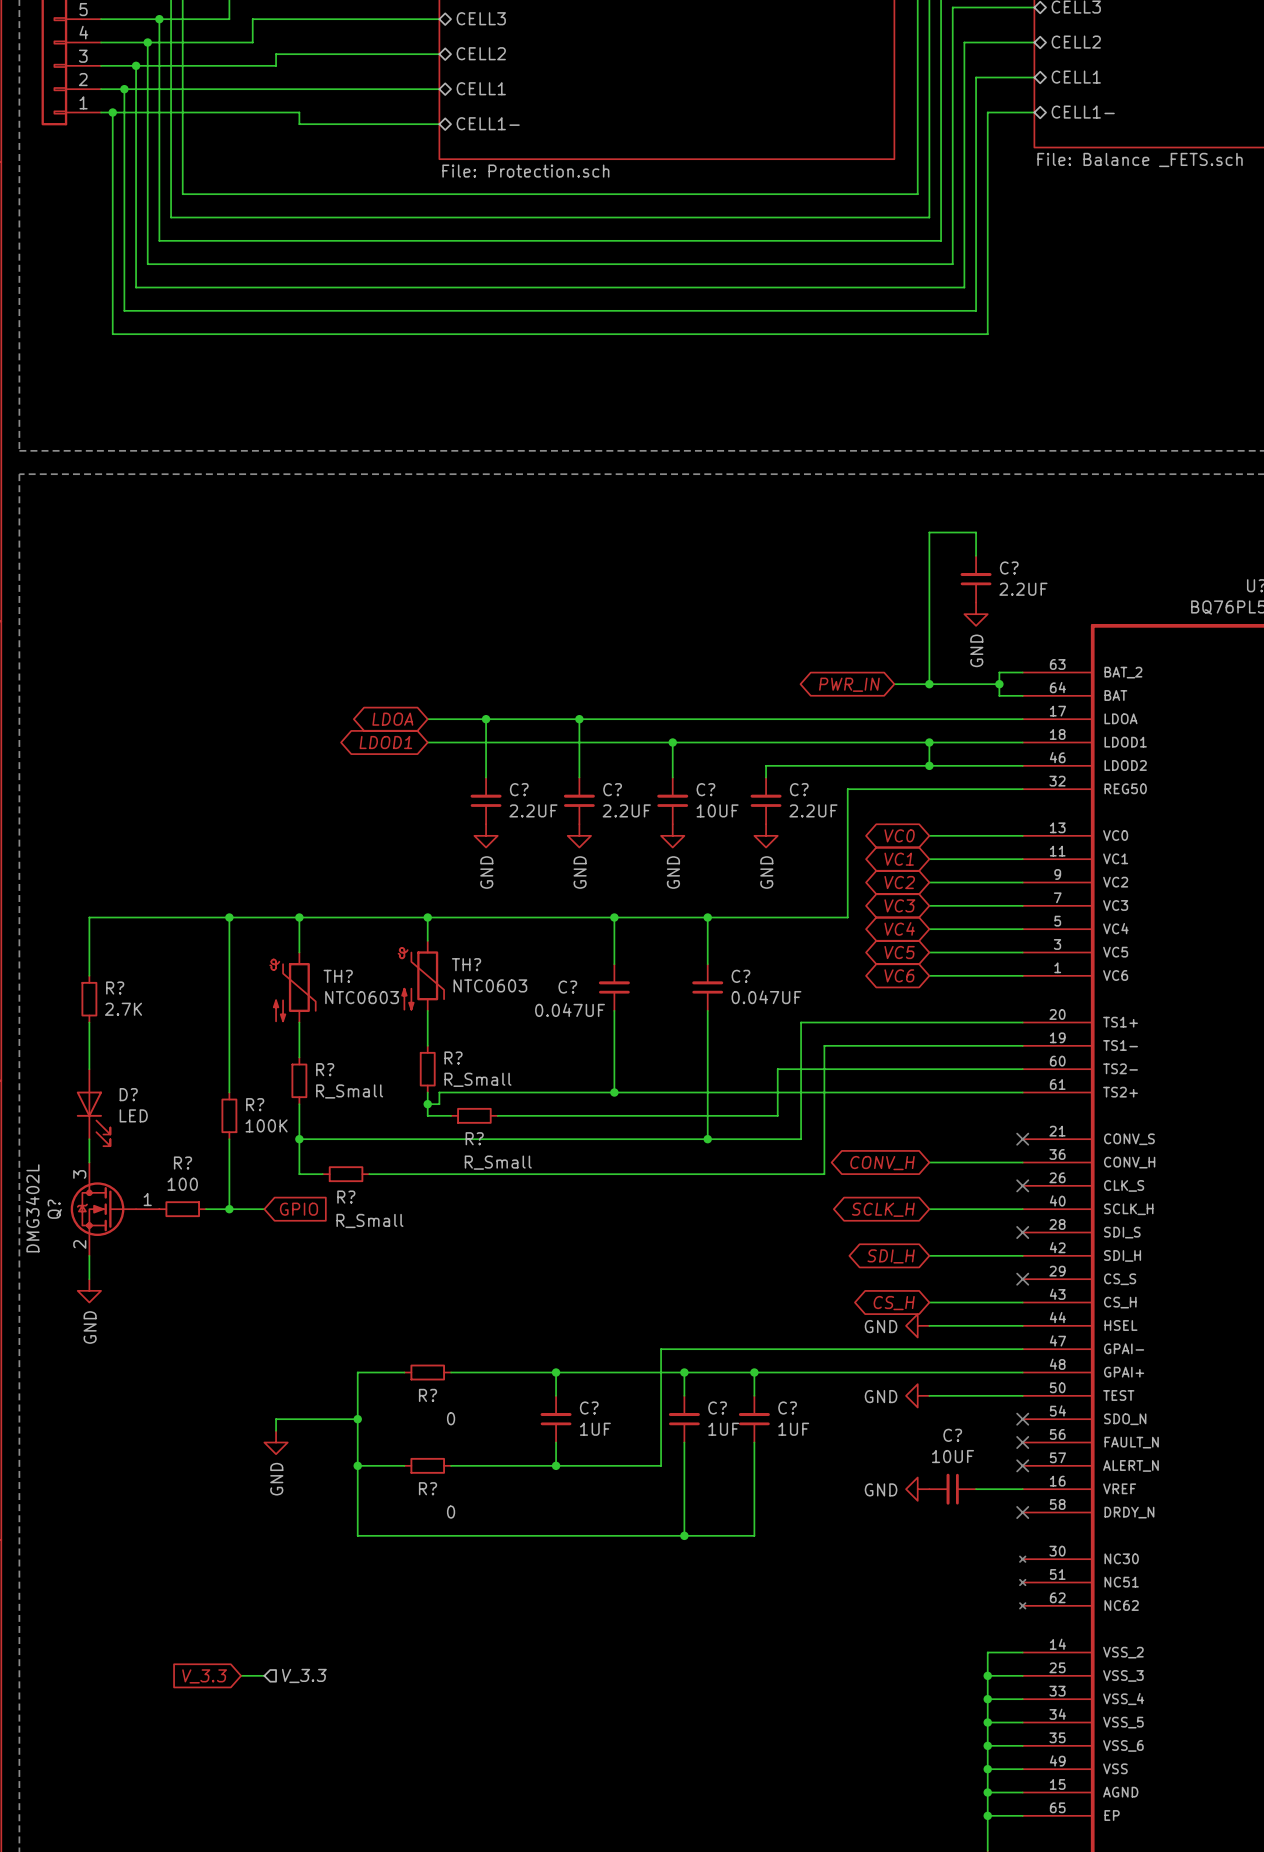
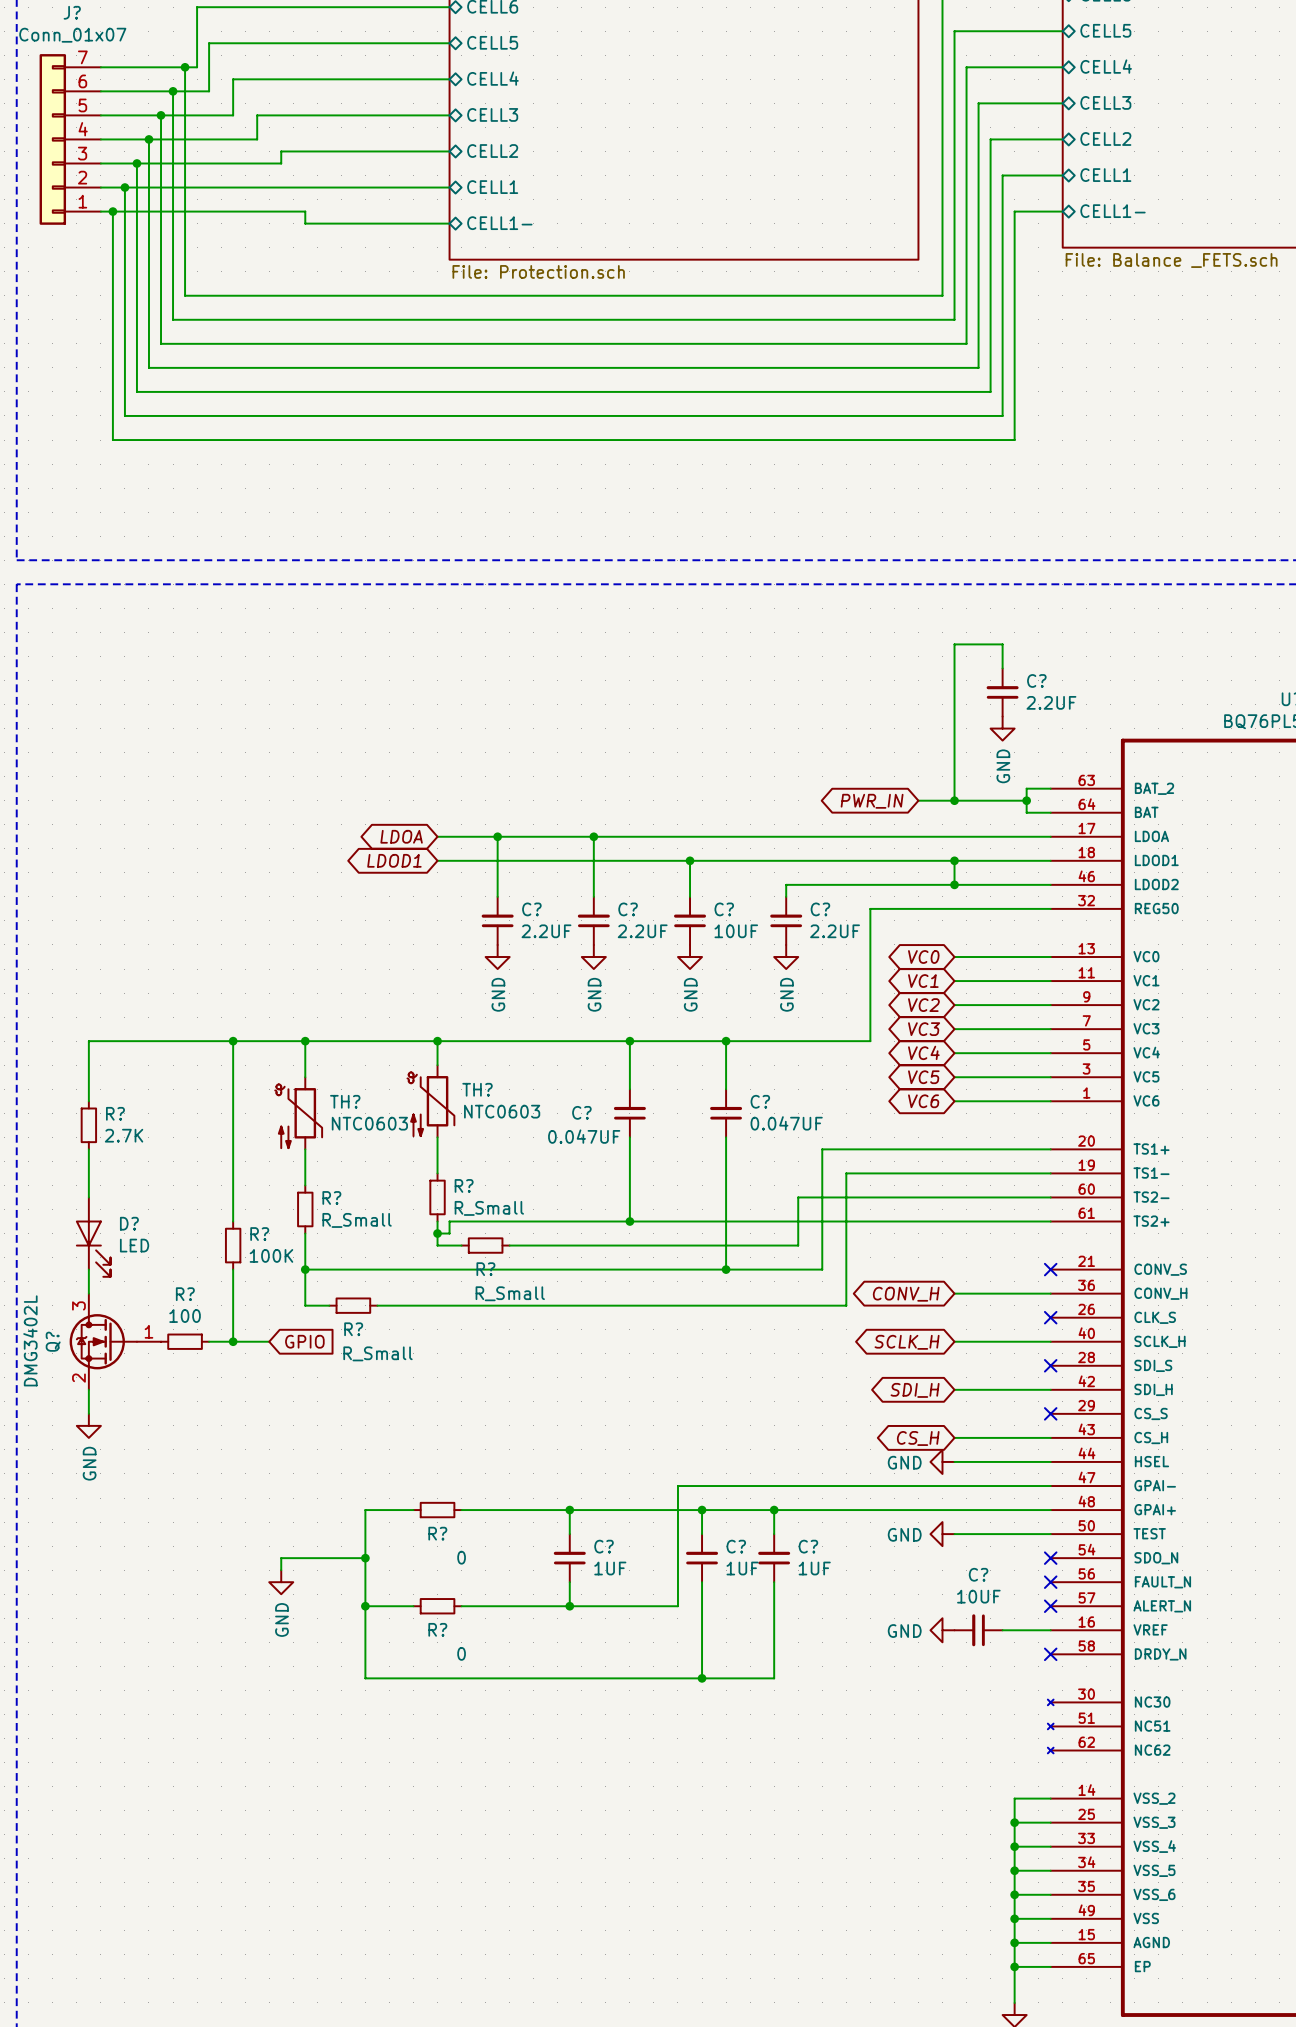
wire: (241, 1675) (264, 1675) -> none
hierarchical label: V_3.3 (304, 1675) -> none
global label: V_3.3 (204, 1676) -> none

